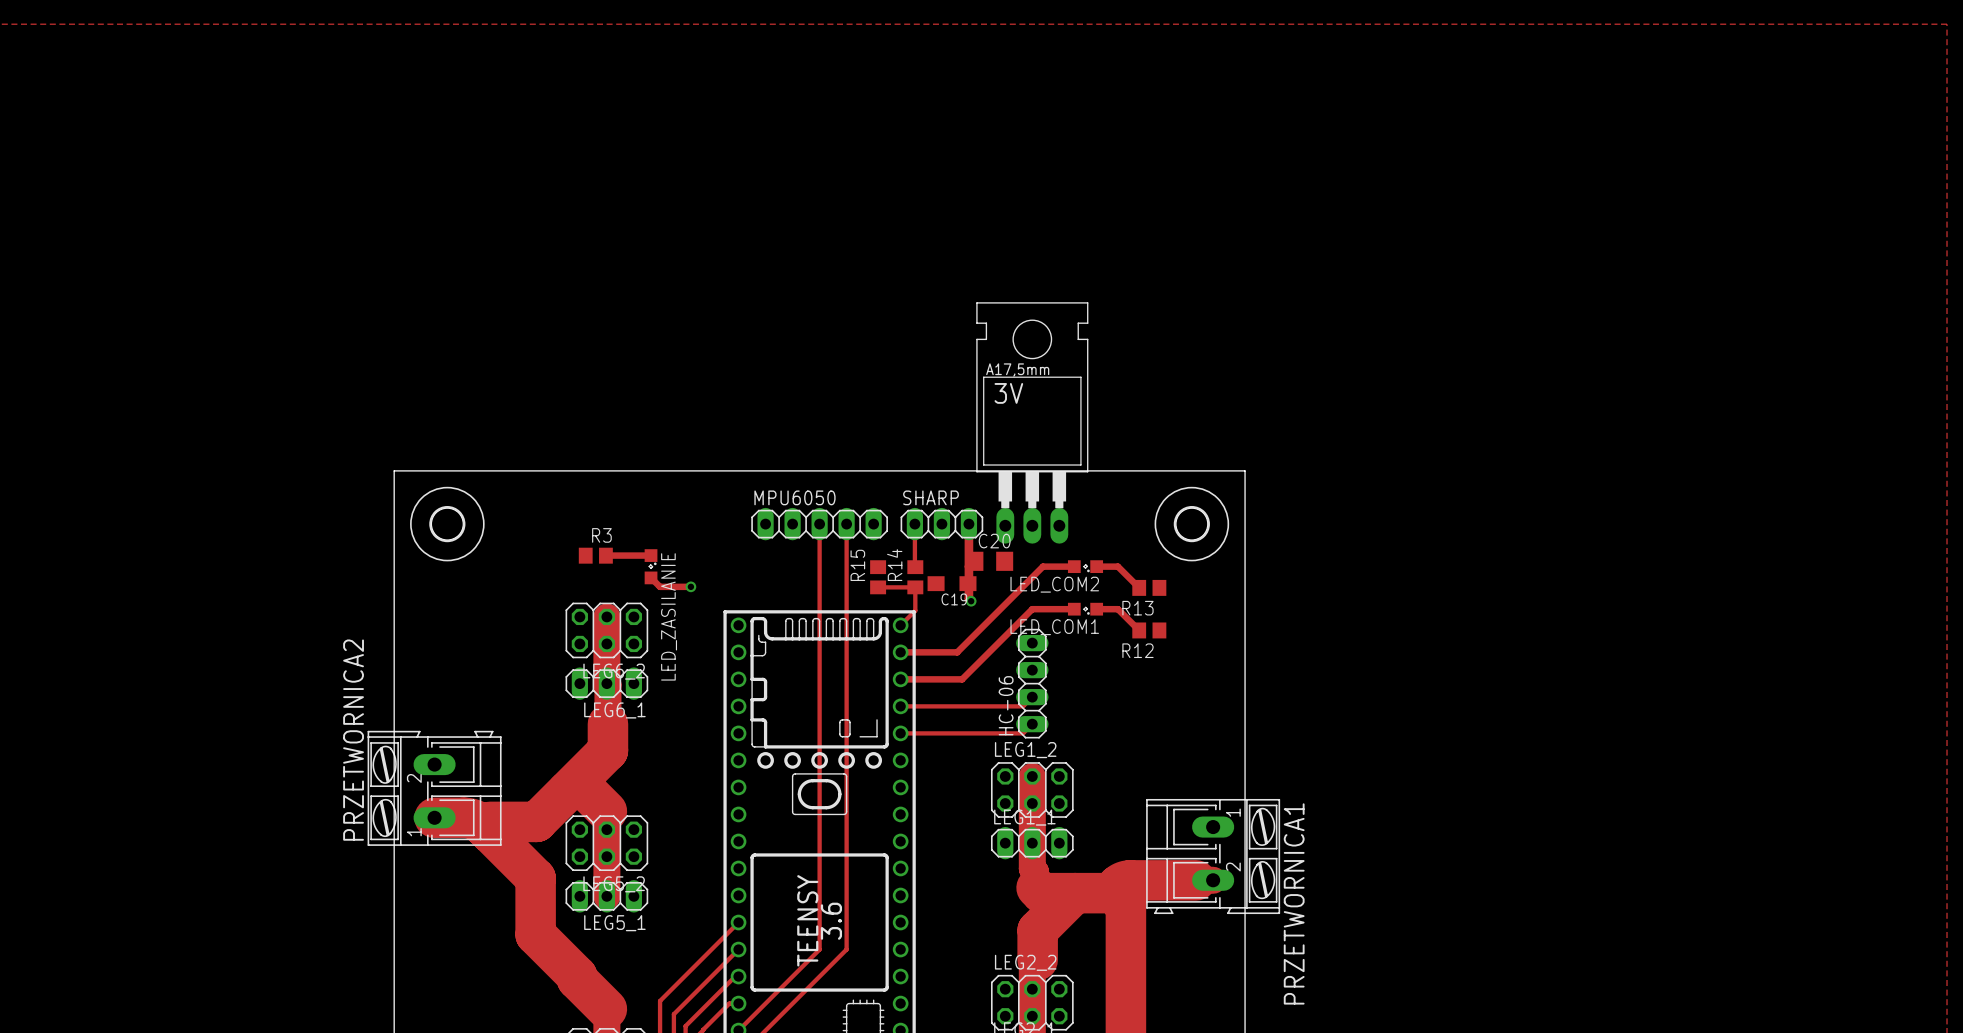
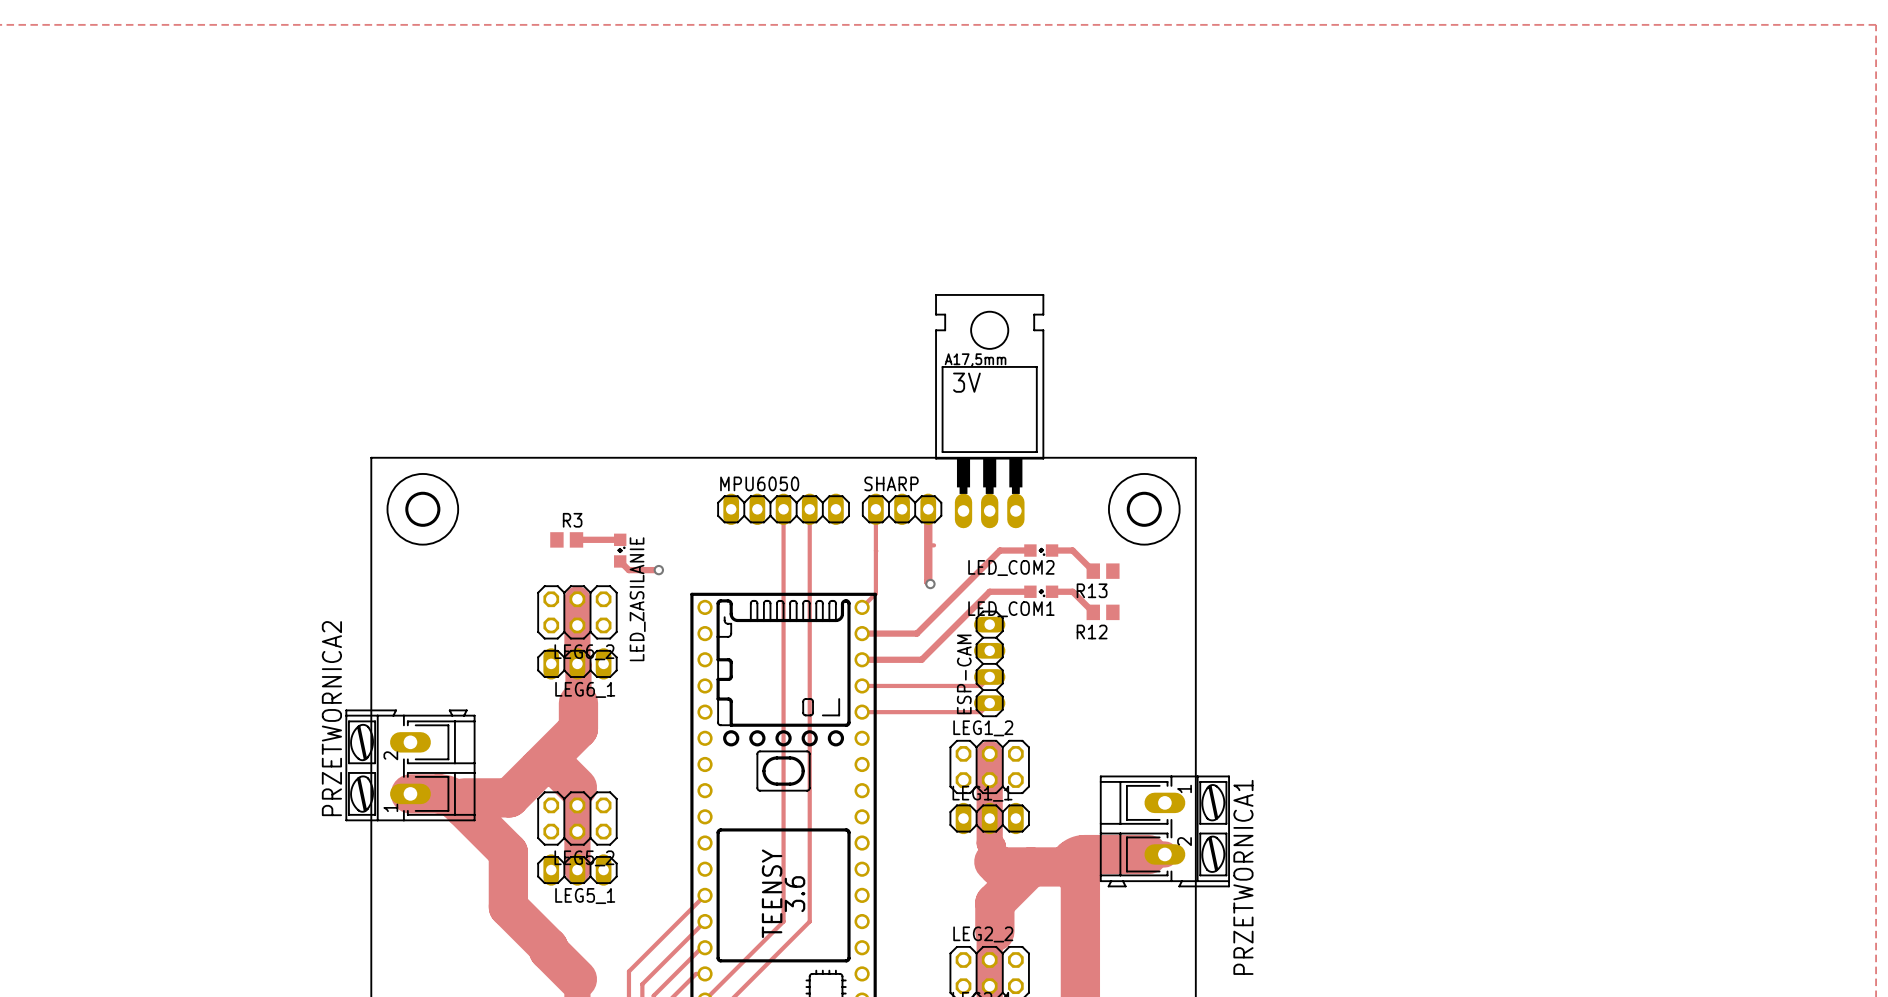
C20: (989, 561) -> none
R15: (878, 577) -> none
R14: (915, 577) -> none
C19: (952, 583) -> none
track: (878, 587) (915, 587) (914, 611) -> (875, 550) (875, 593)
HC-06 name: HC-06 (1006, 705) -> ESP-CAM (964, 674)

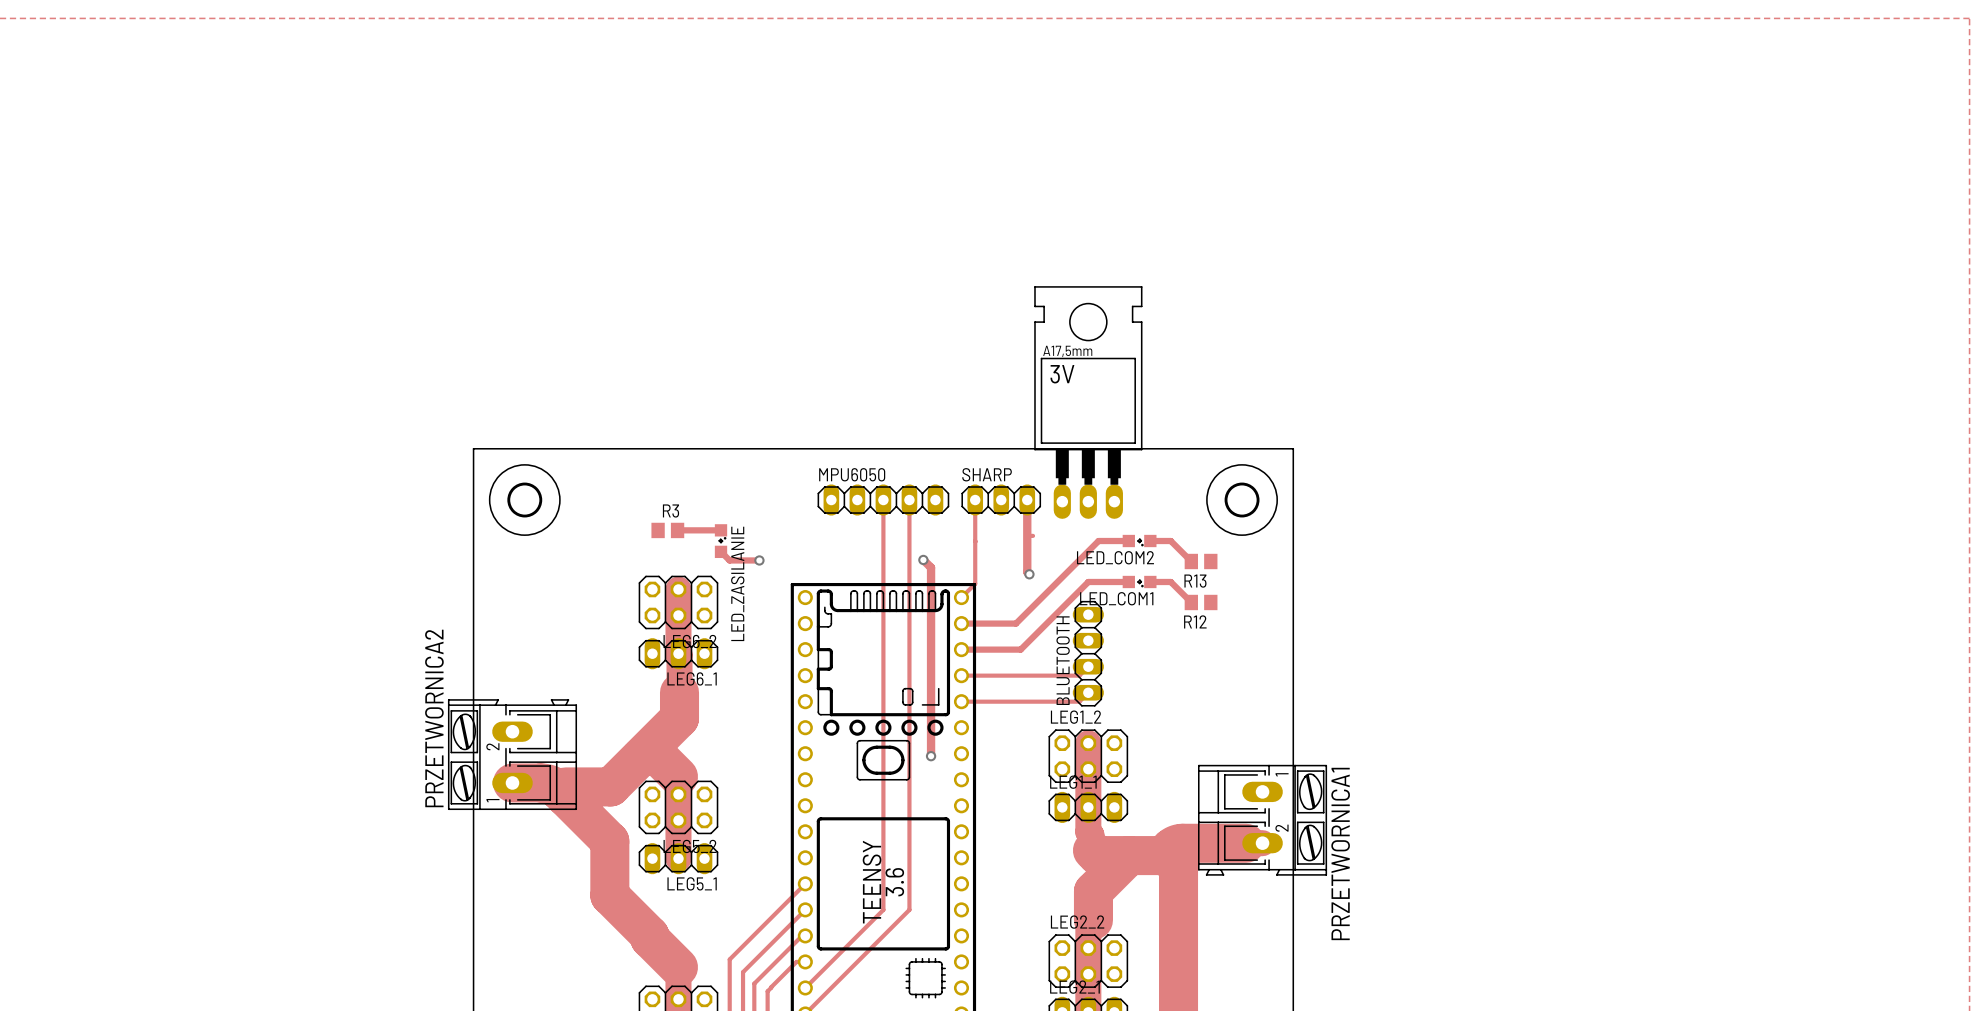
track: none -> (923, 559) (931, 567) (931, 756)
via: none -> (923, 559)
ESP-CAM name: ESP-CAM (964, 674) -> BLUETOOTH (1063, 660)
via: none -> (931, 756)

